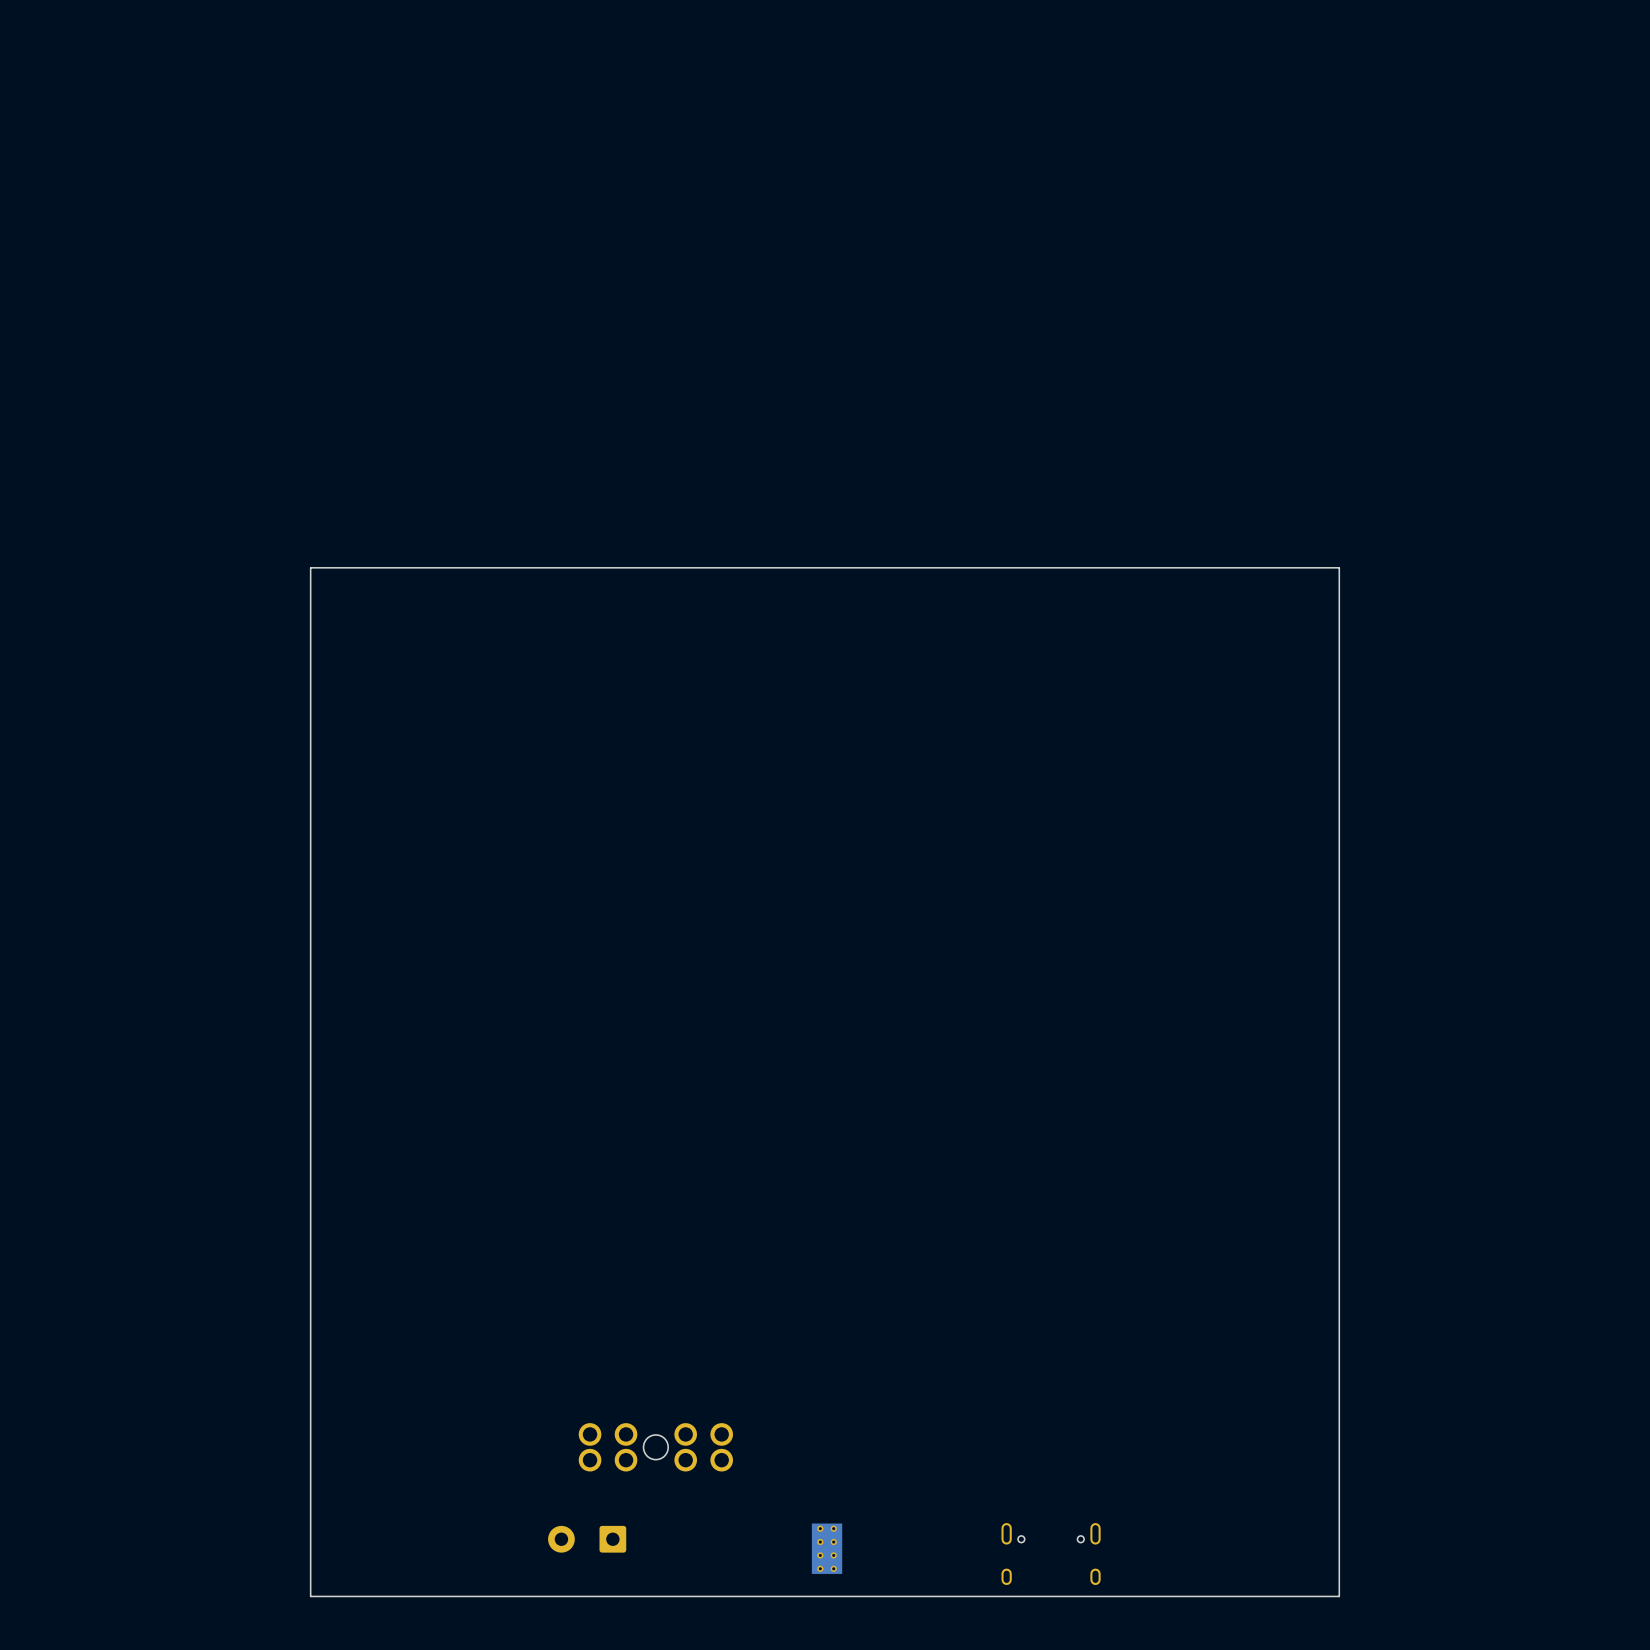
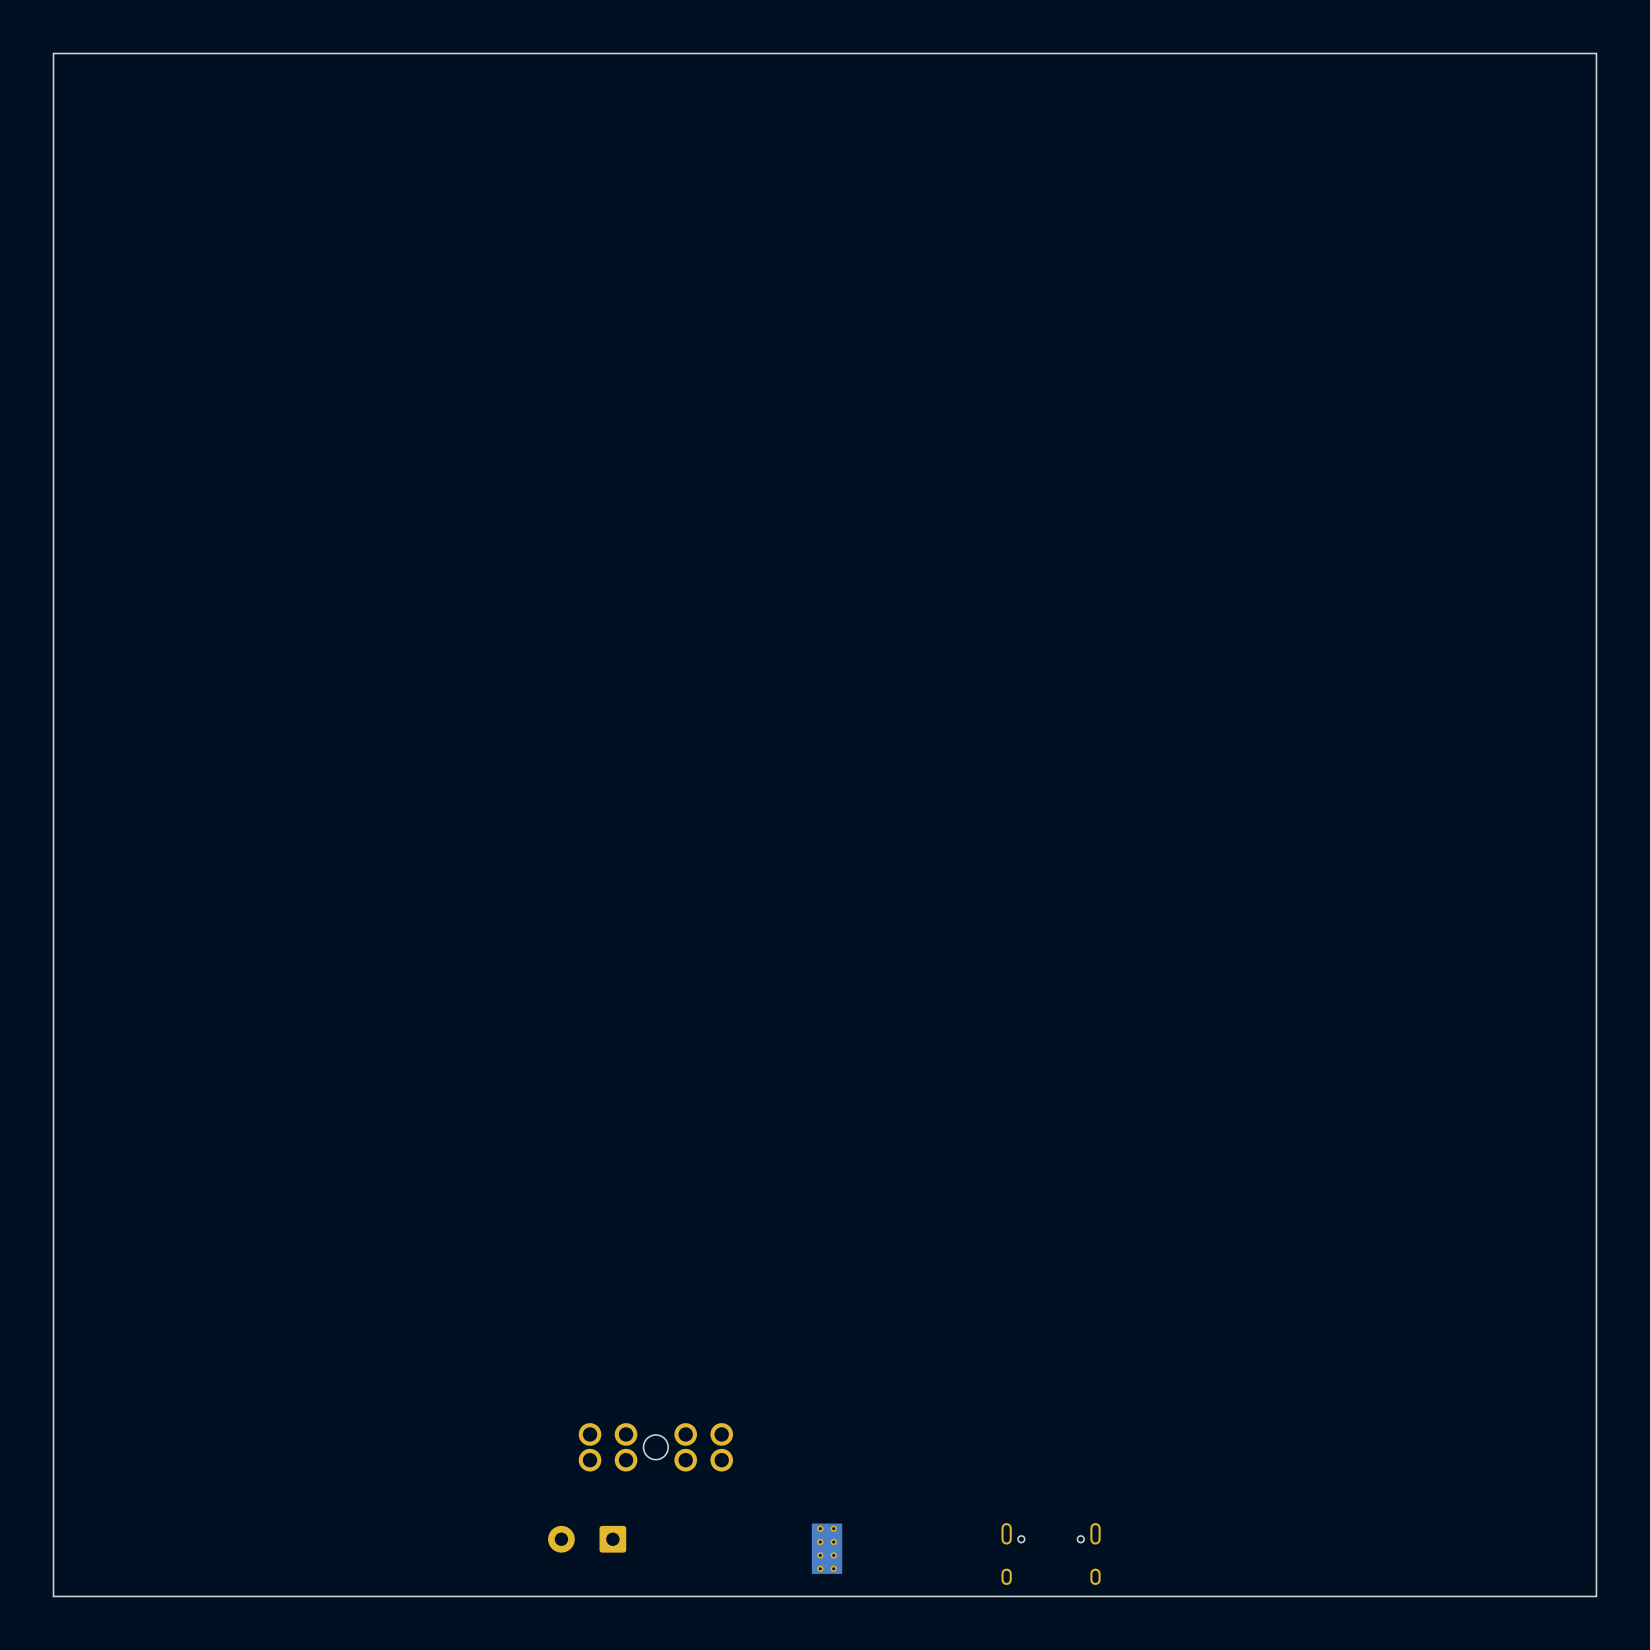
board edge: (1339, 1596) (1339, 567) (310, 567) (310, 1596) -> (1339, 1596) (1596, 1596) (1596, 53) (53, 53) (53, 1596) (310, 1596)

